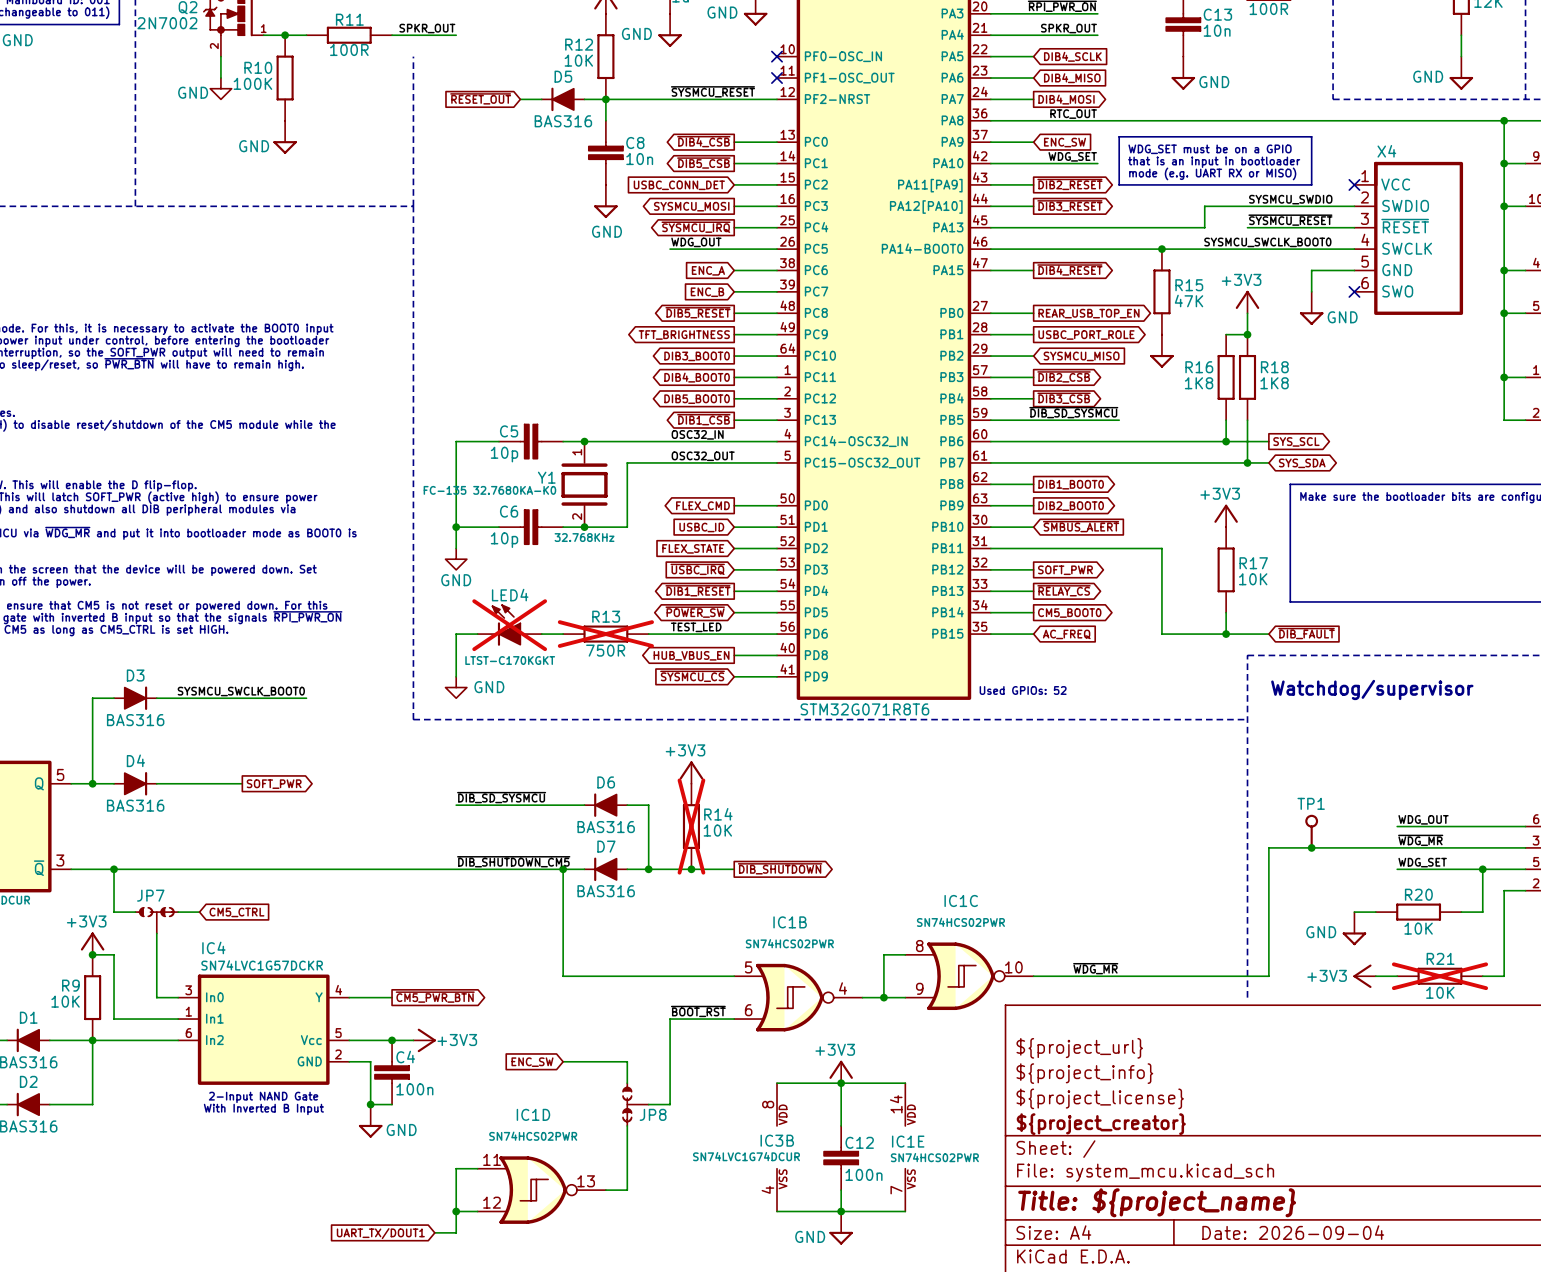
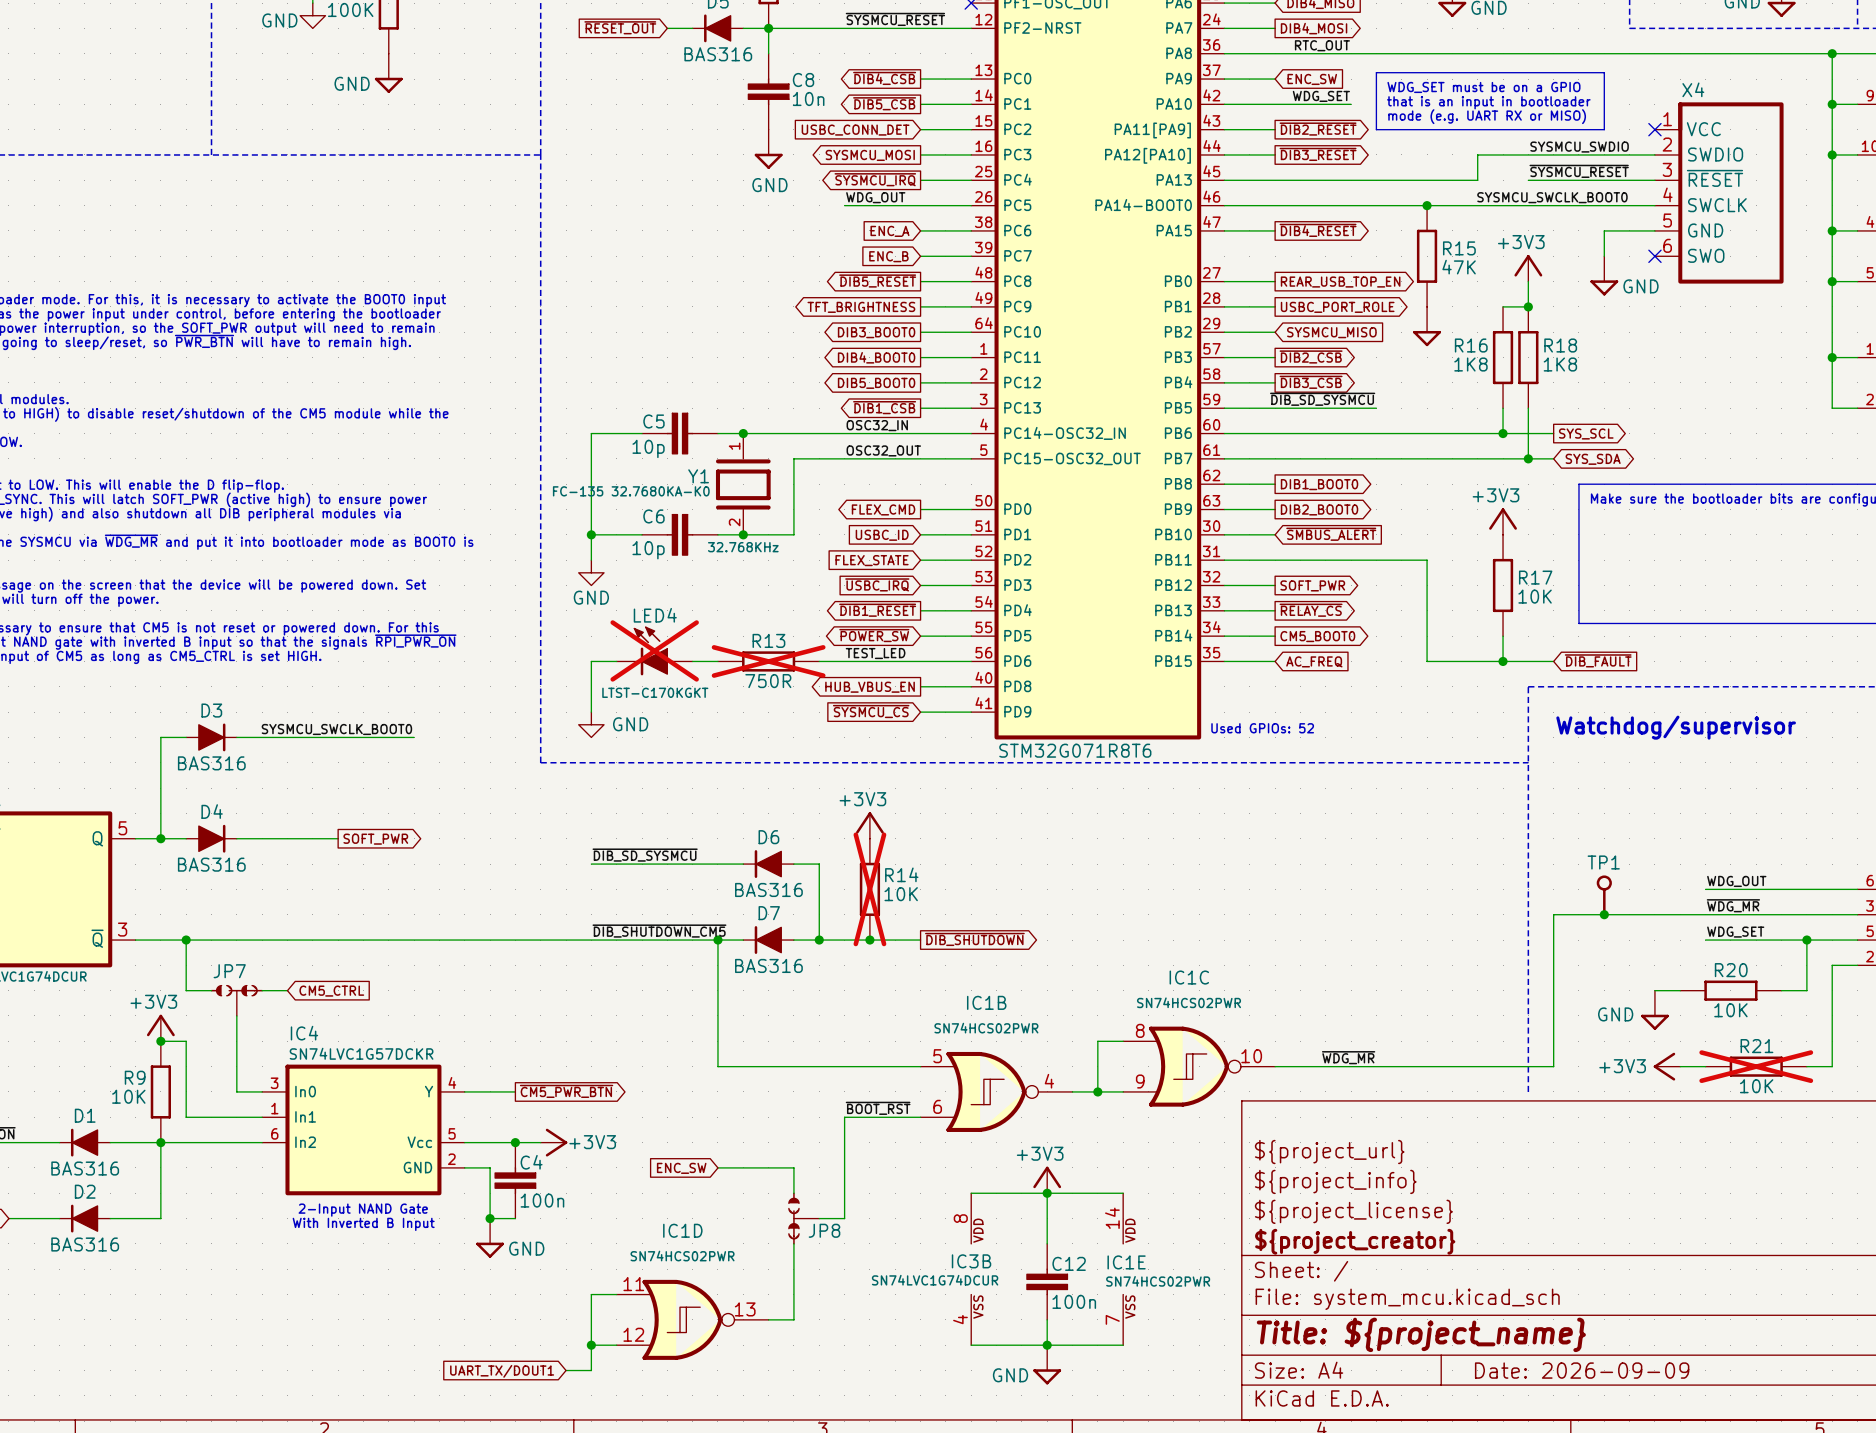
title block: Date: 2026-09-04 (1293, 1232) -> Date: 2026-09-09 (1582, 1370)

